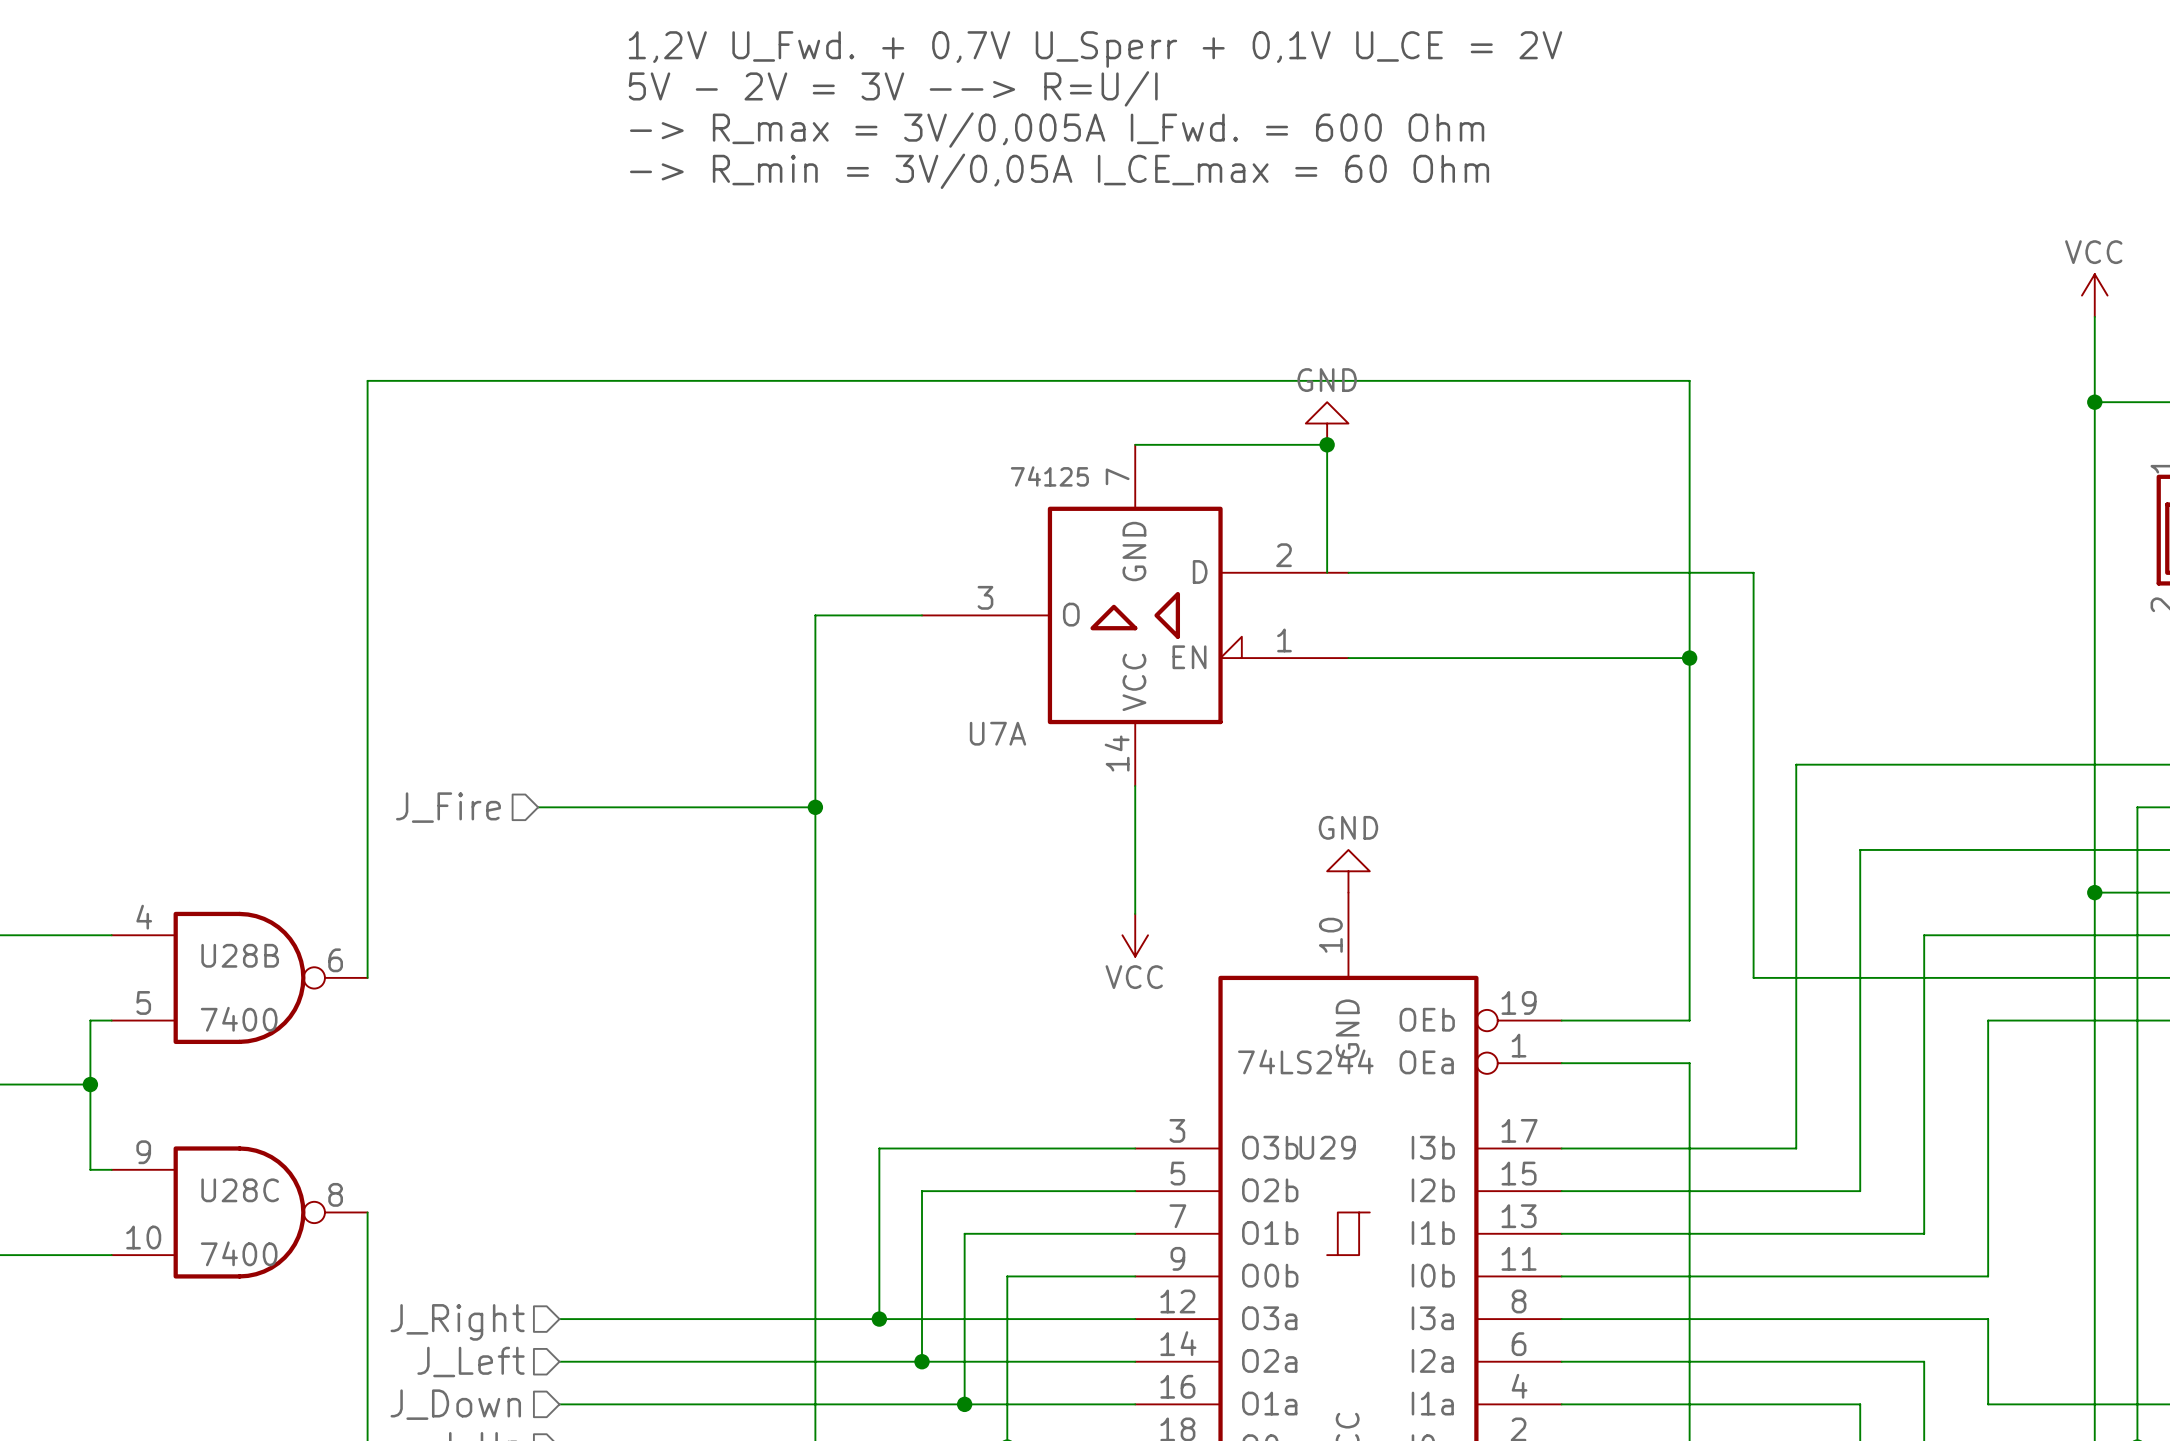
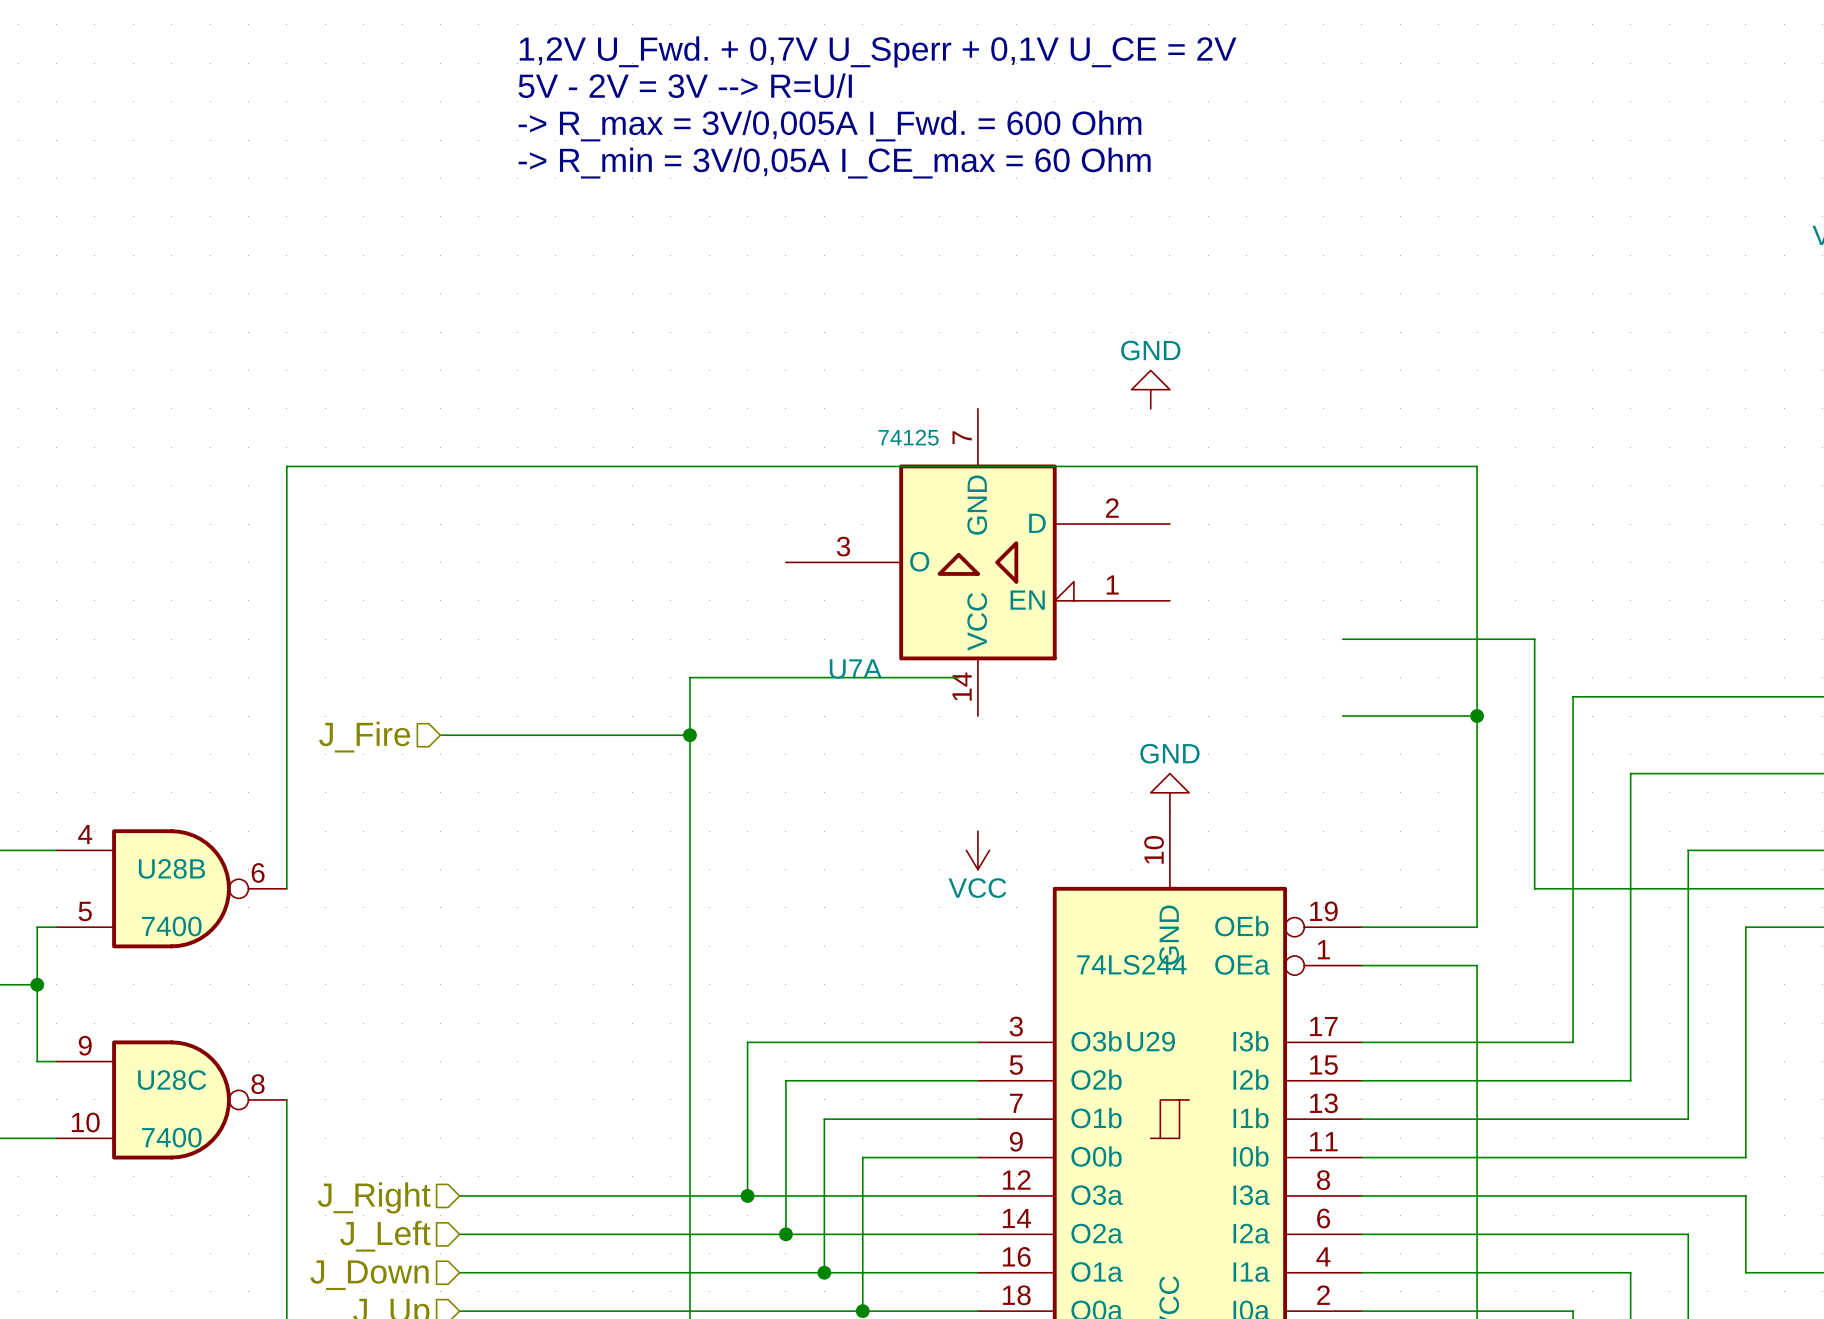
wire: (1135, 444) (1327, 444) (1327, 572) -> none
junction: (1327, 444) -> none
wire: (367, 508) (367, 380) (1689, 380) (1689, 508) -> (286, 466) (1477, 466)
wire: (1348, 572) (1753, 572) (1753, 700) -> (1342, 639) (1534, 639)
wire: (922, 615) (815, 615) (815, 743) -> (958, 677) (689, 677)
wire: (1348, 658) (1689, 658) -> none
junction: (1689, 658) -> none
wire: (1135, 786) (1135, 913) -> none
wire: none -> (1342, 716) (1477, 716)
junction: none -> (1477, 716)

